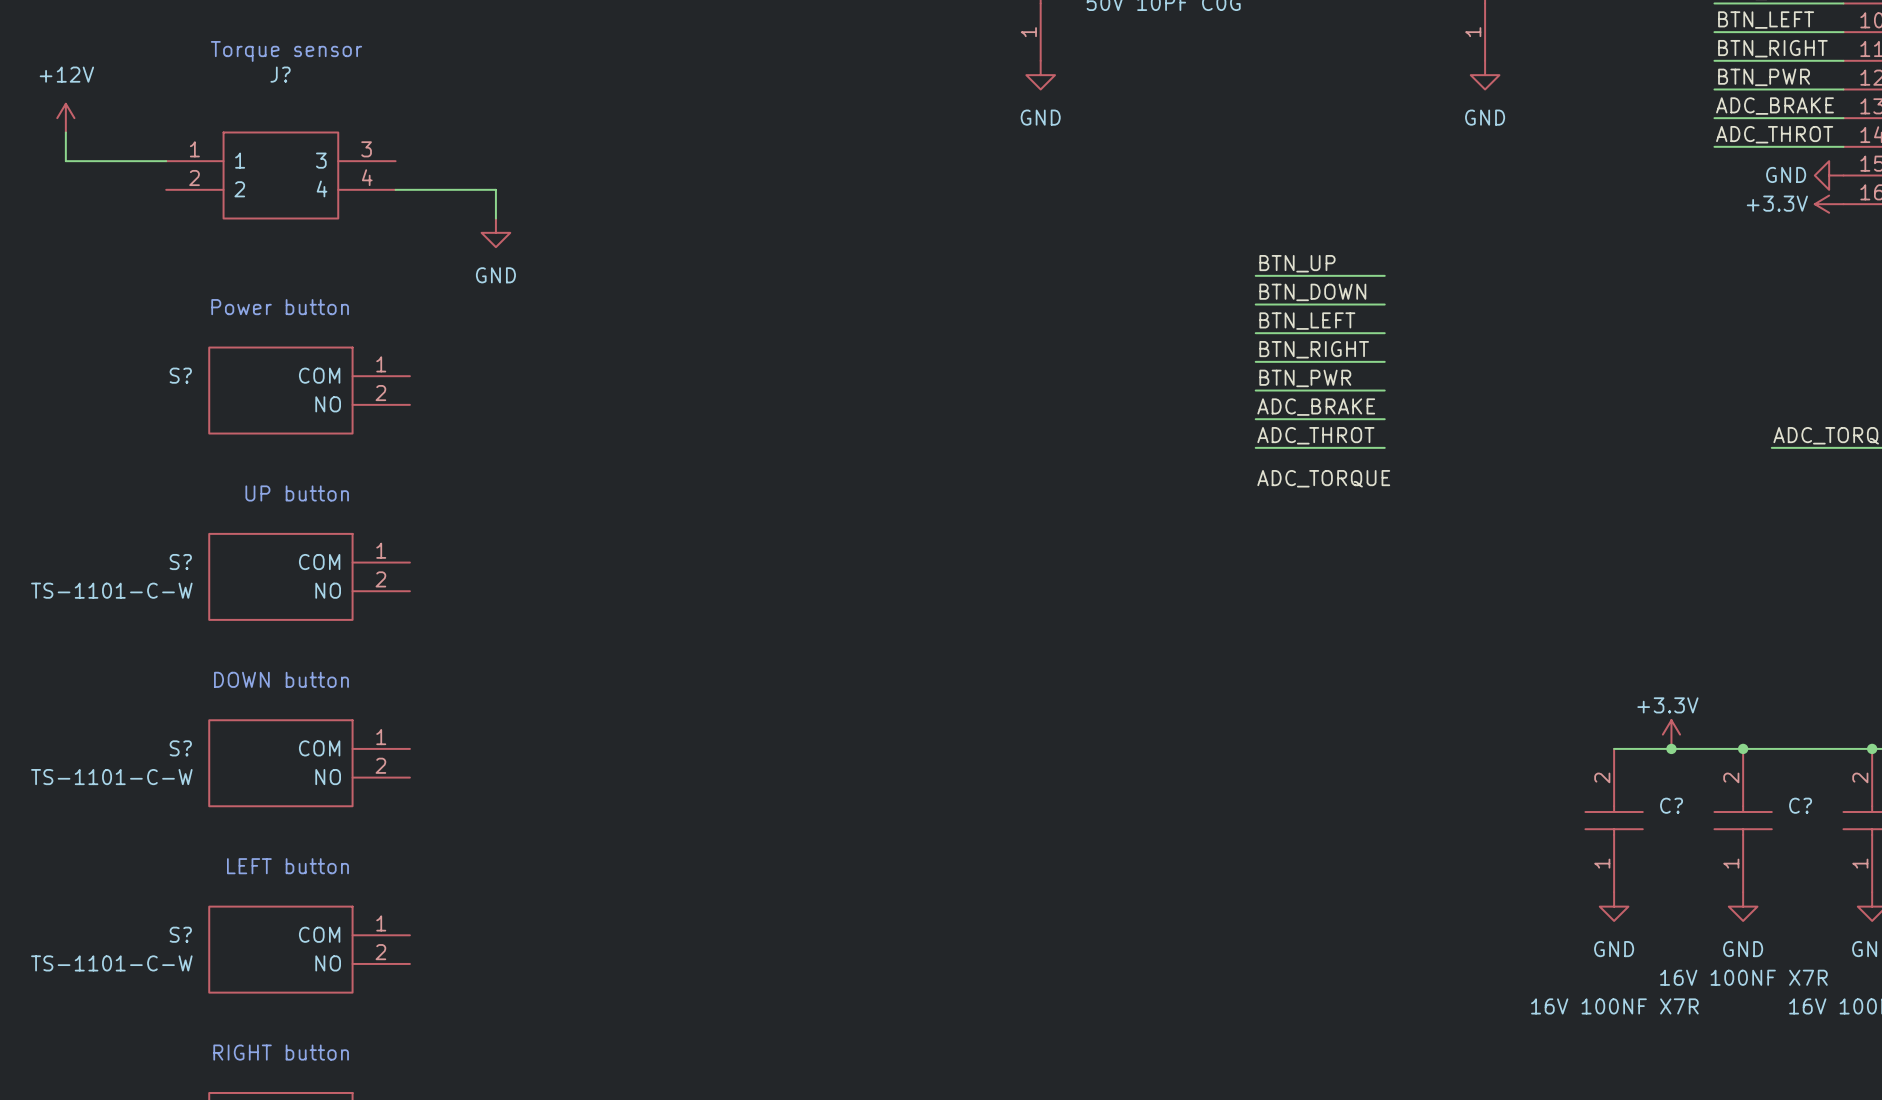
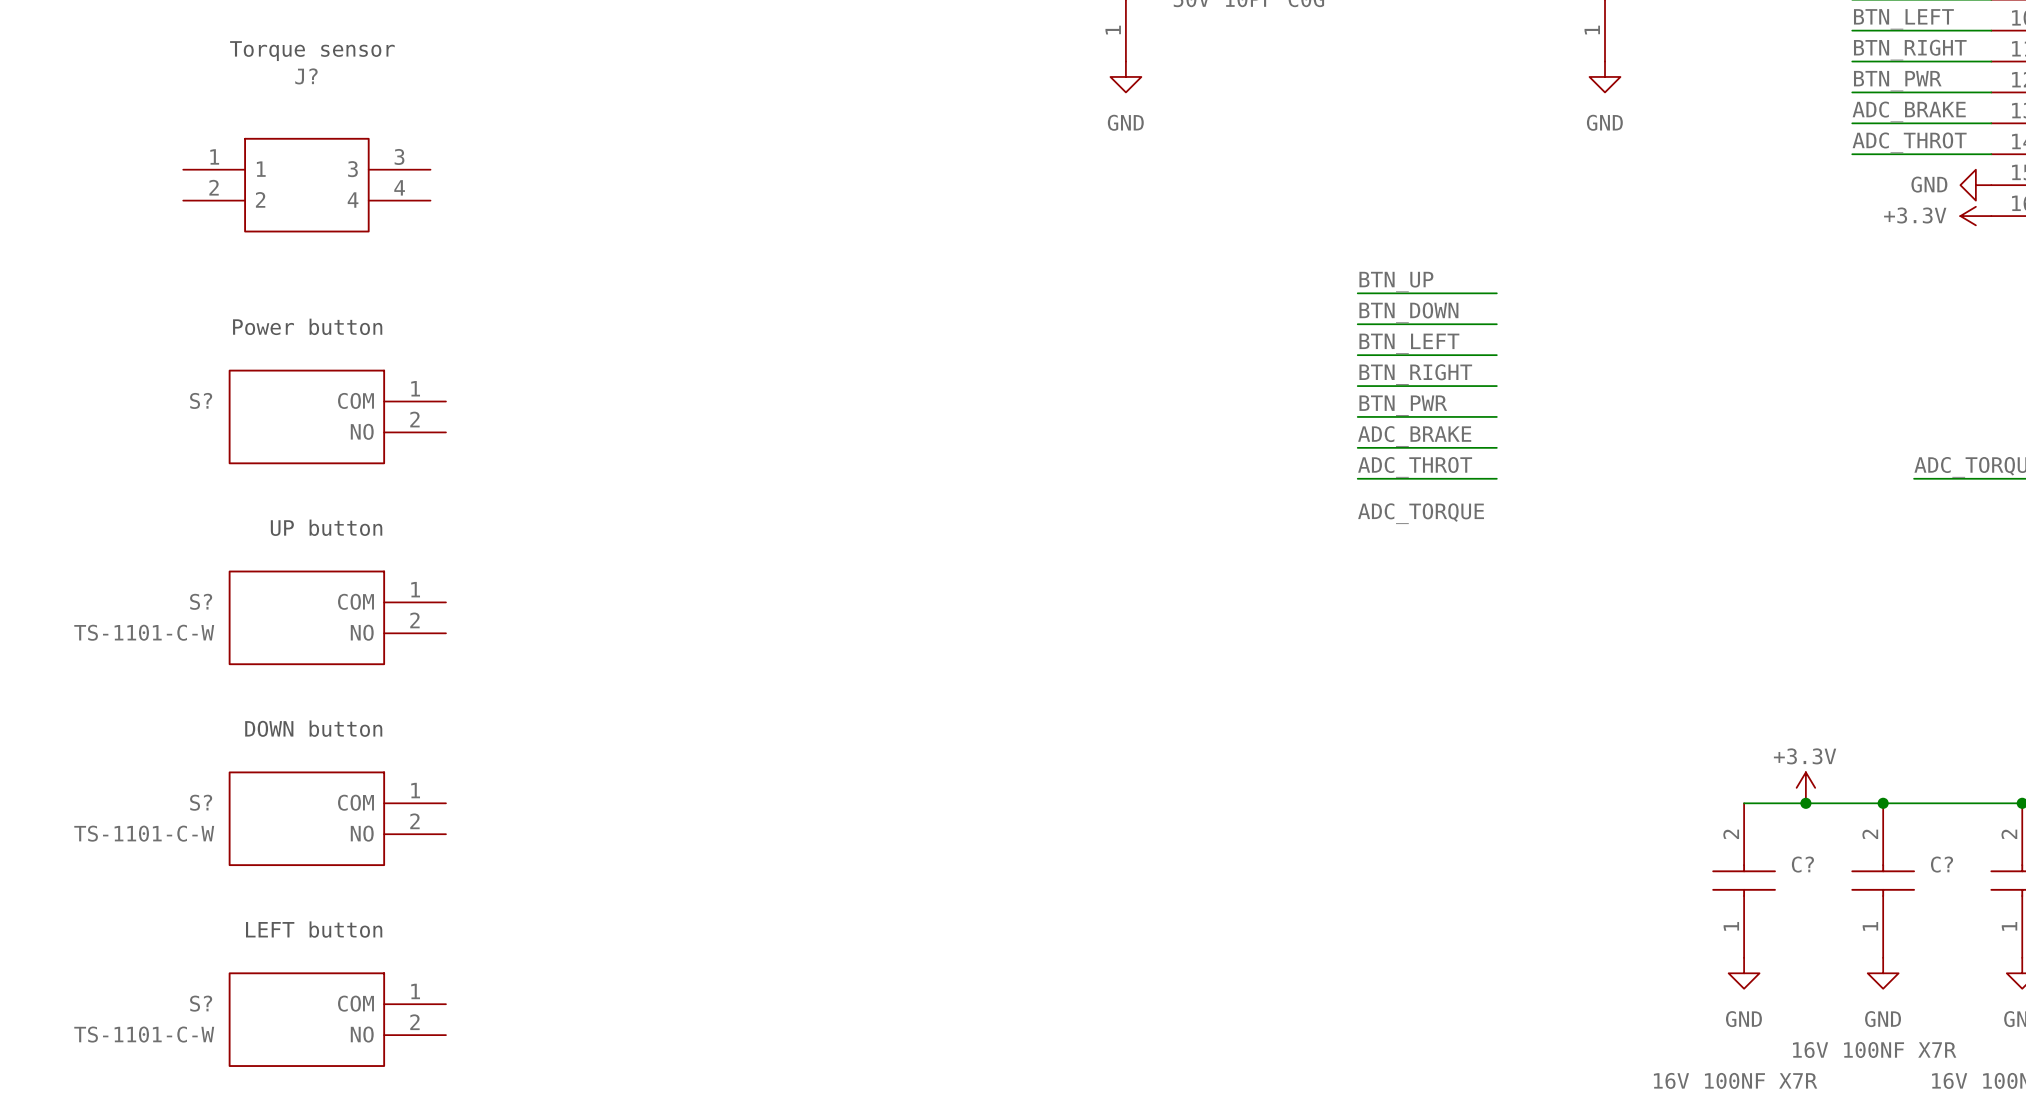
power symbol: +12V (65, 118) -> none
wire: (65, 132) (65, 161) (166, 161) -> none
wire: (395, 189) (495, 189) (495, 218) -> none
power symbol: GND (495, 232) -> none

